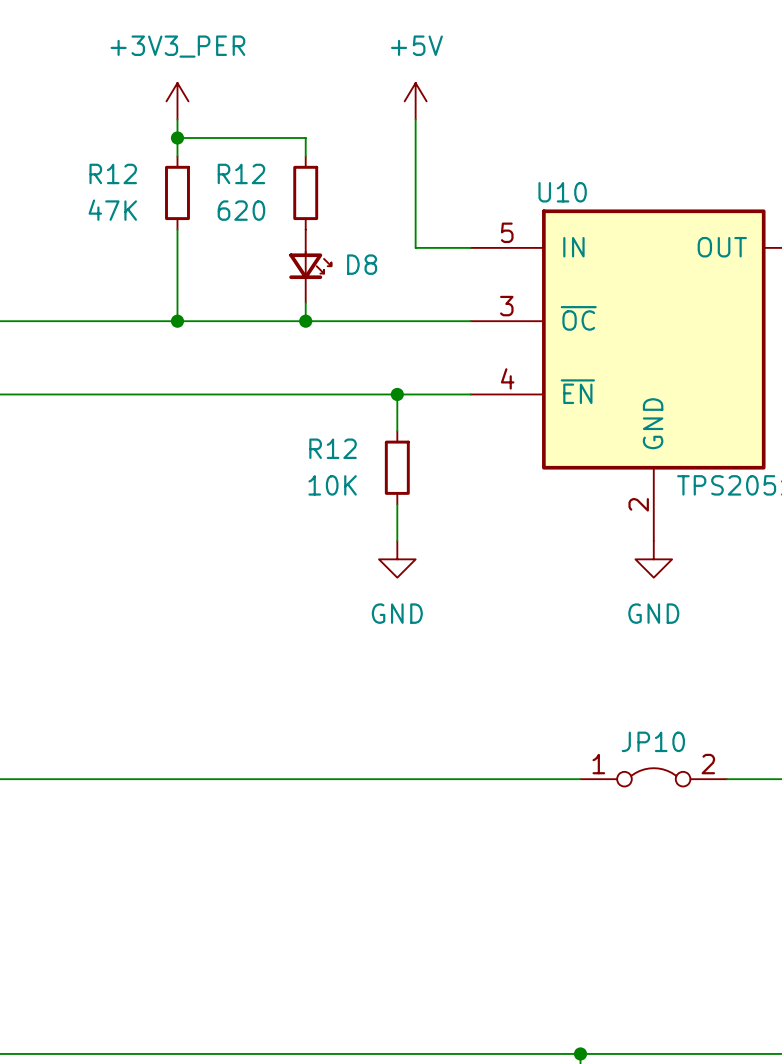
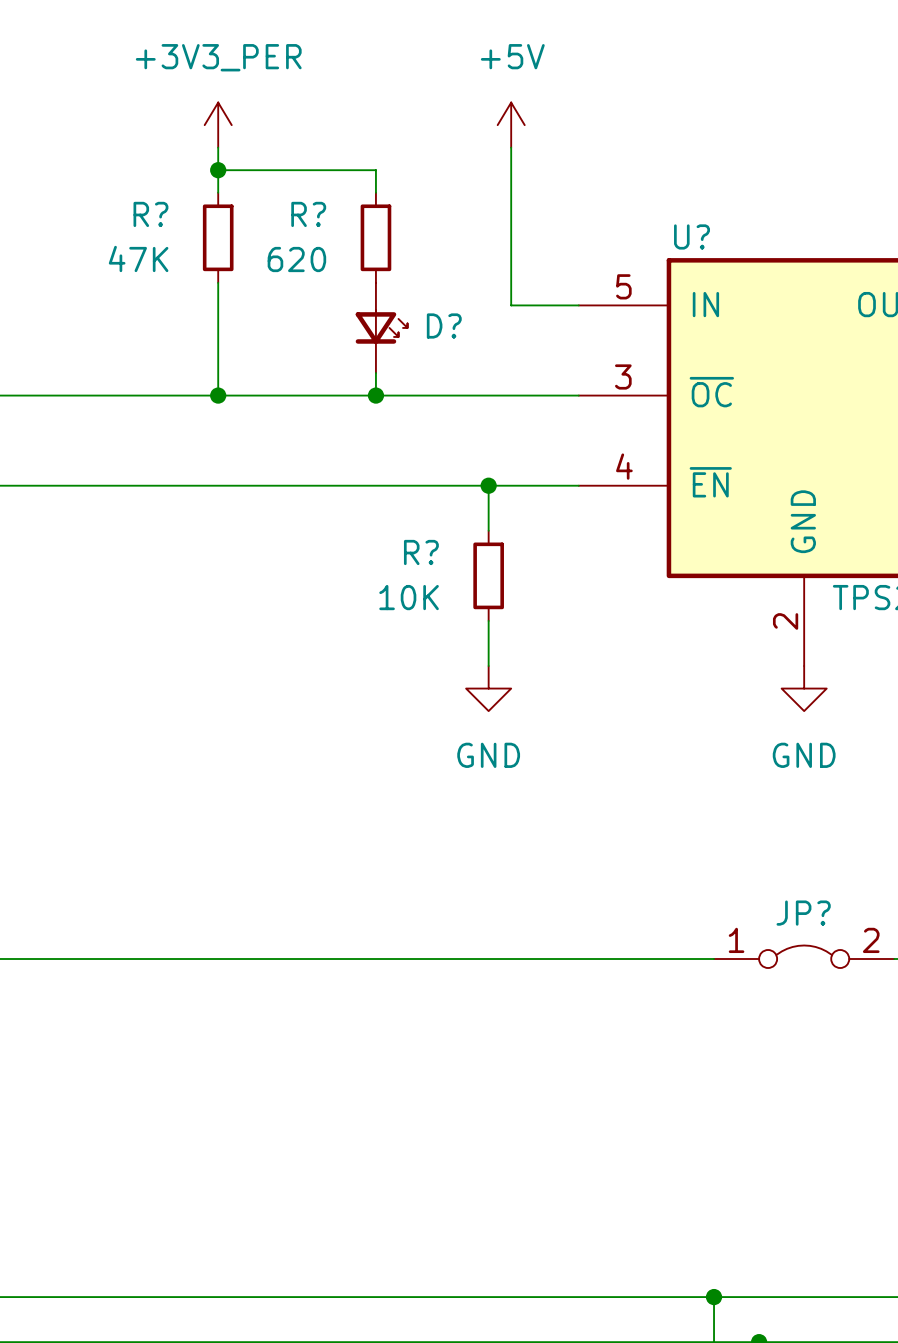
R12 name: R12 (113, 173) -> R? (150, 214)
R12 name: R12 (241, 173) -> R? (308, 214)
U10 name: U10 (562, 192) -> U? (692, 236)
D8 name: D8 (362, 264) -> D? (444, 325)
R12 name: R12 (333, 448) -> R? (421, 552)
JP10 name: JP10 (653, 741) -> JP? (803, 913)

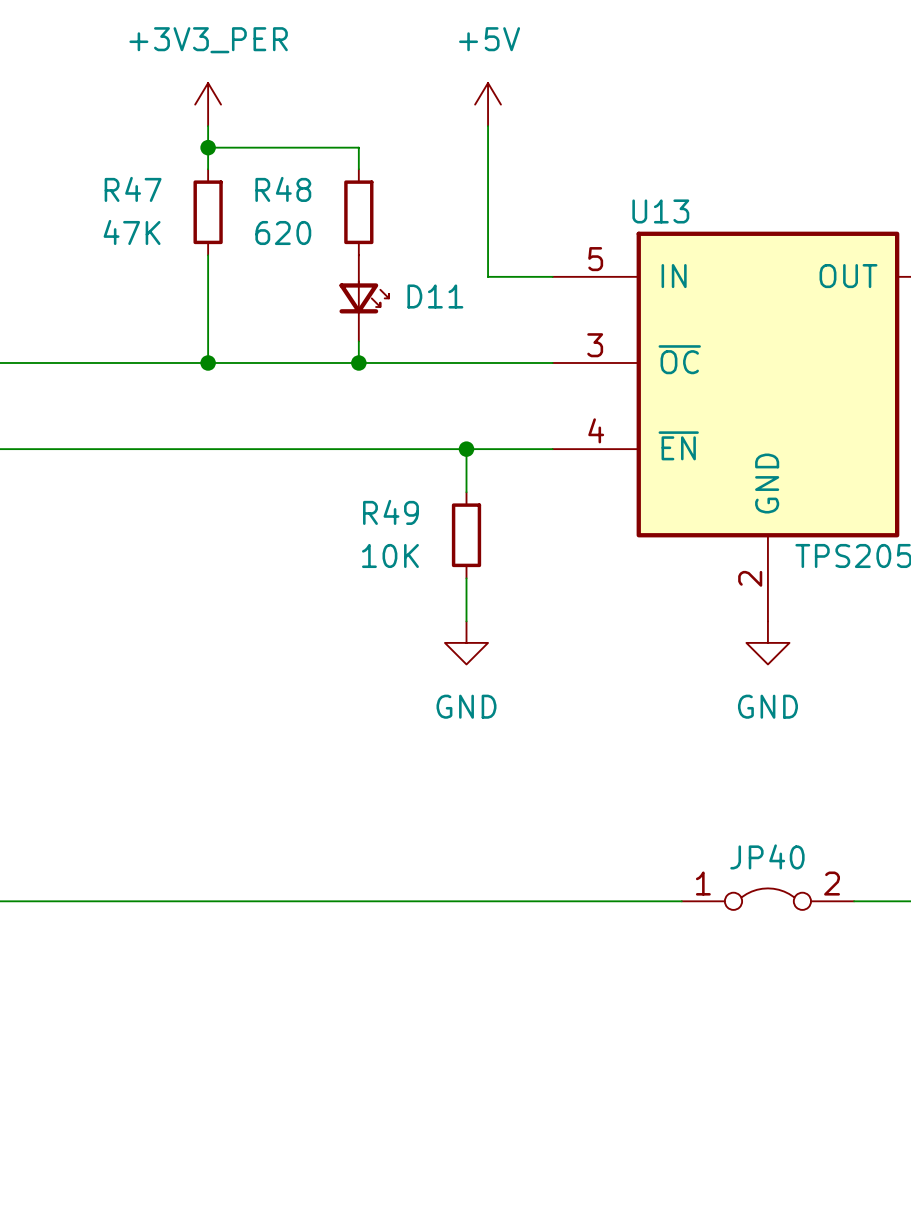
R? name: R? (150, 214) -> R47 (133, 189)
R? name: R? (308, 214) -> R48 (283, 189)
U? name: U? (692, 236) -> U13 (660, 211)
D? name: D? (444, 325) -> D11 (435, 296)
R? name: R? (421, 552) -> R49 (390, 512)
JP? name: JP? (803, 913) -> JP40 (767, 856)

